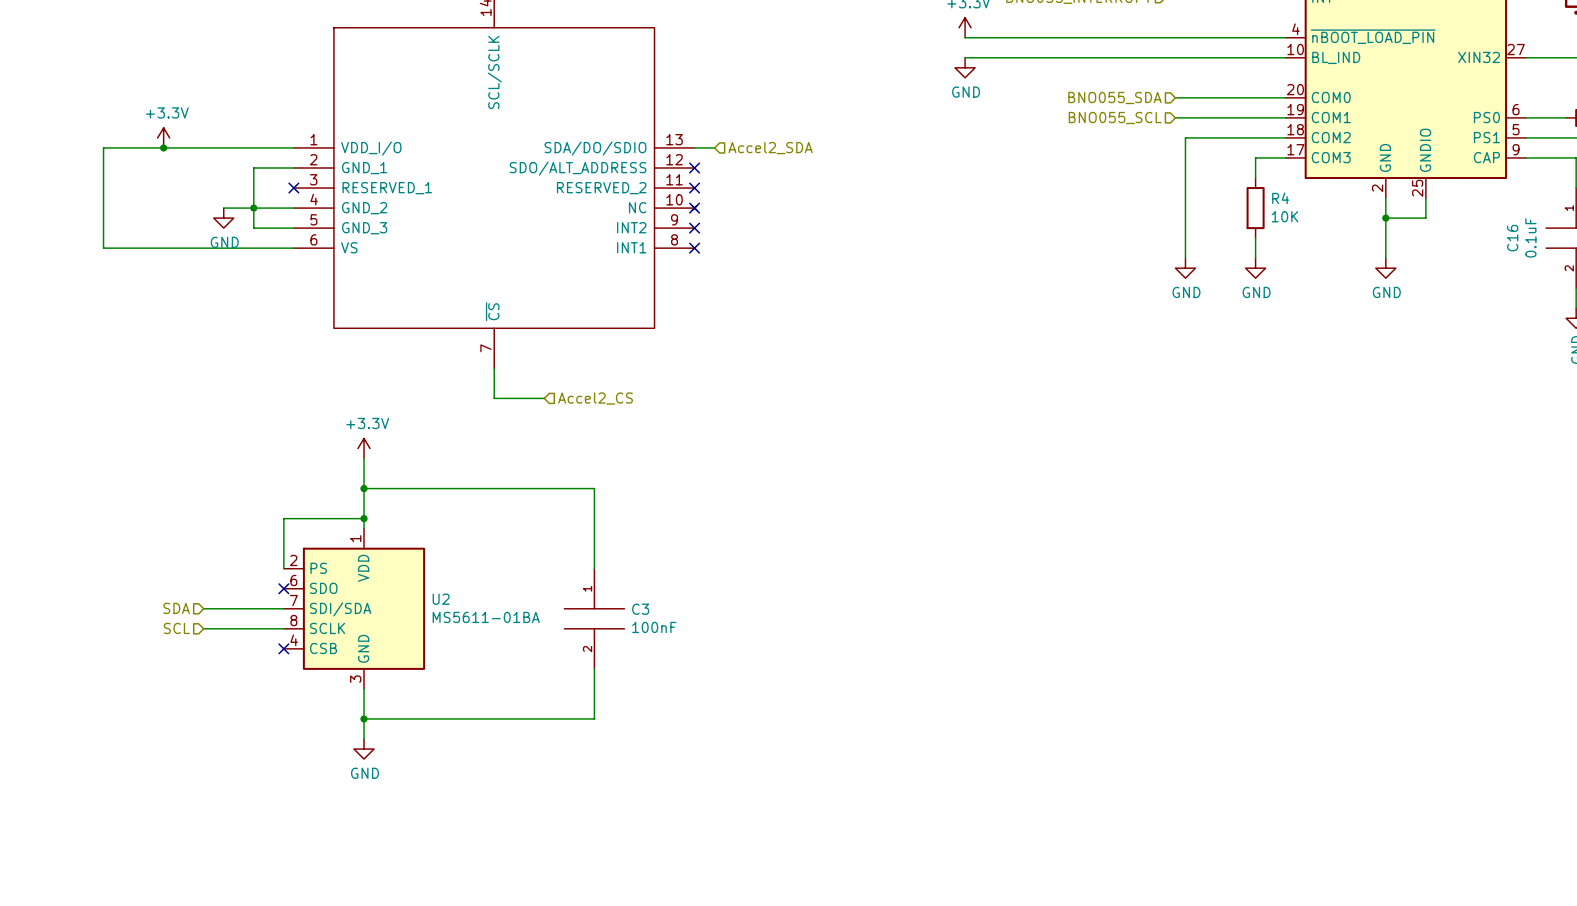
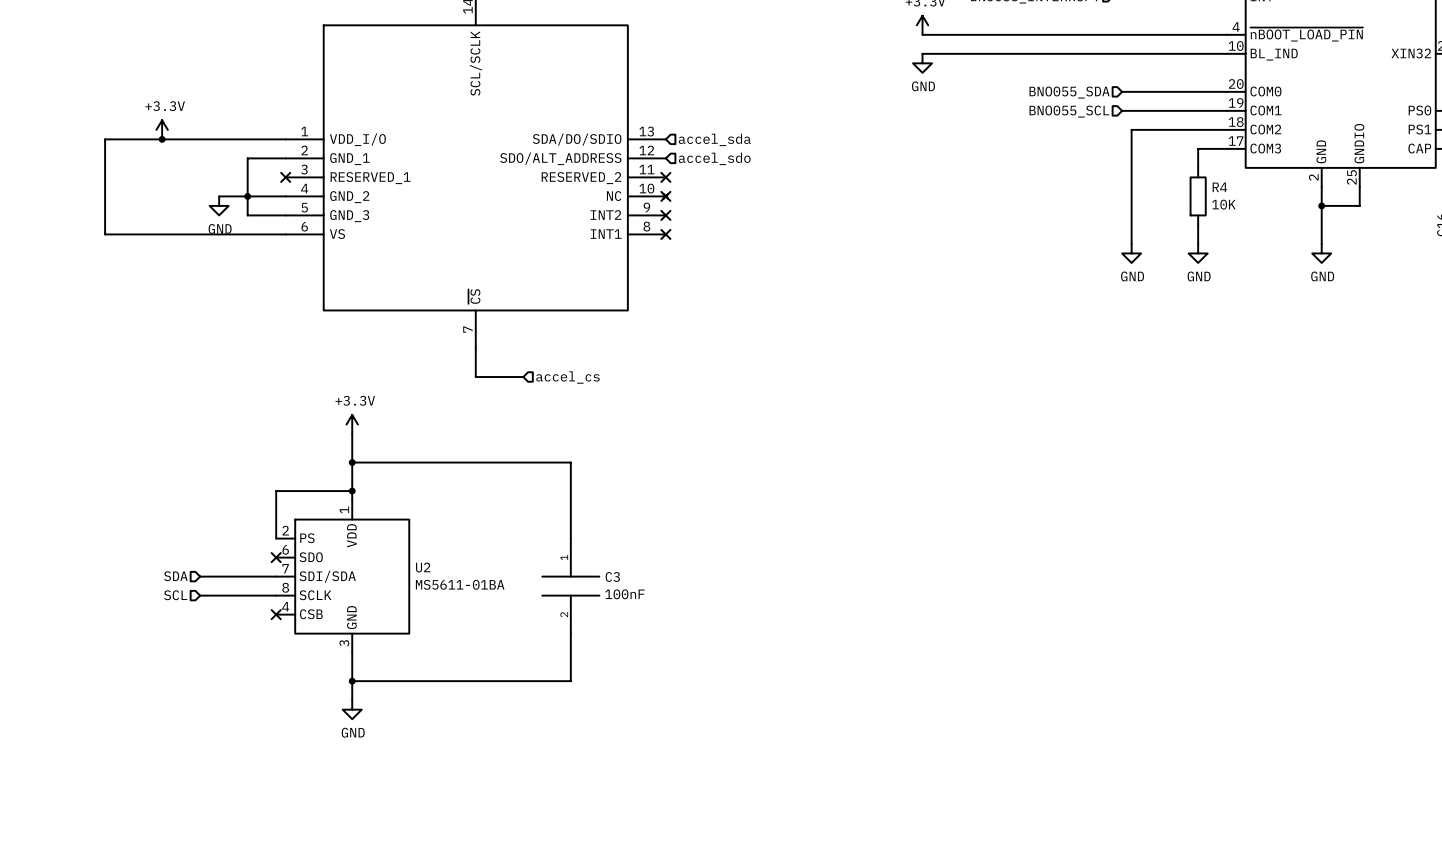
wire: (694, 147) (714, 147) -> none
hierarchical label: none -> accel_sda (714, 139)
hierarchical label: Accel2_SDA (770, 148) -> none
no-connect mark: (694, 168) -> none
hierarchical label: none -> accel_sdo (714, 158)
hierarchical label: Accel2_CS (595, 398) -> accel_cs (568, 377)

